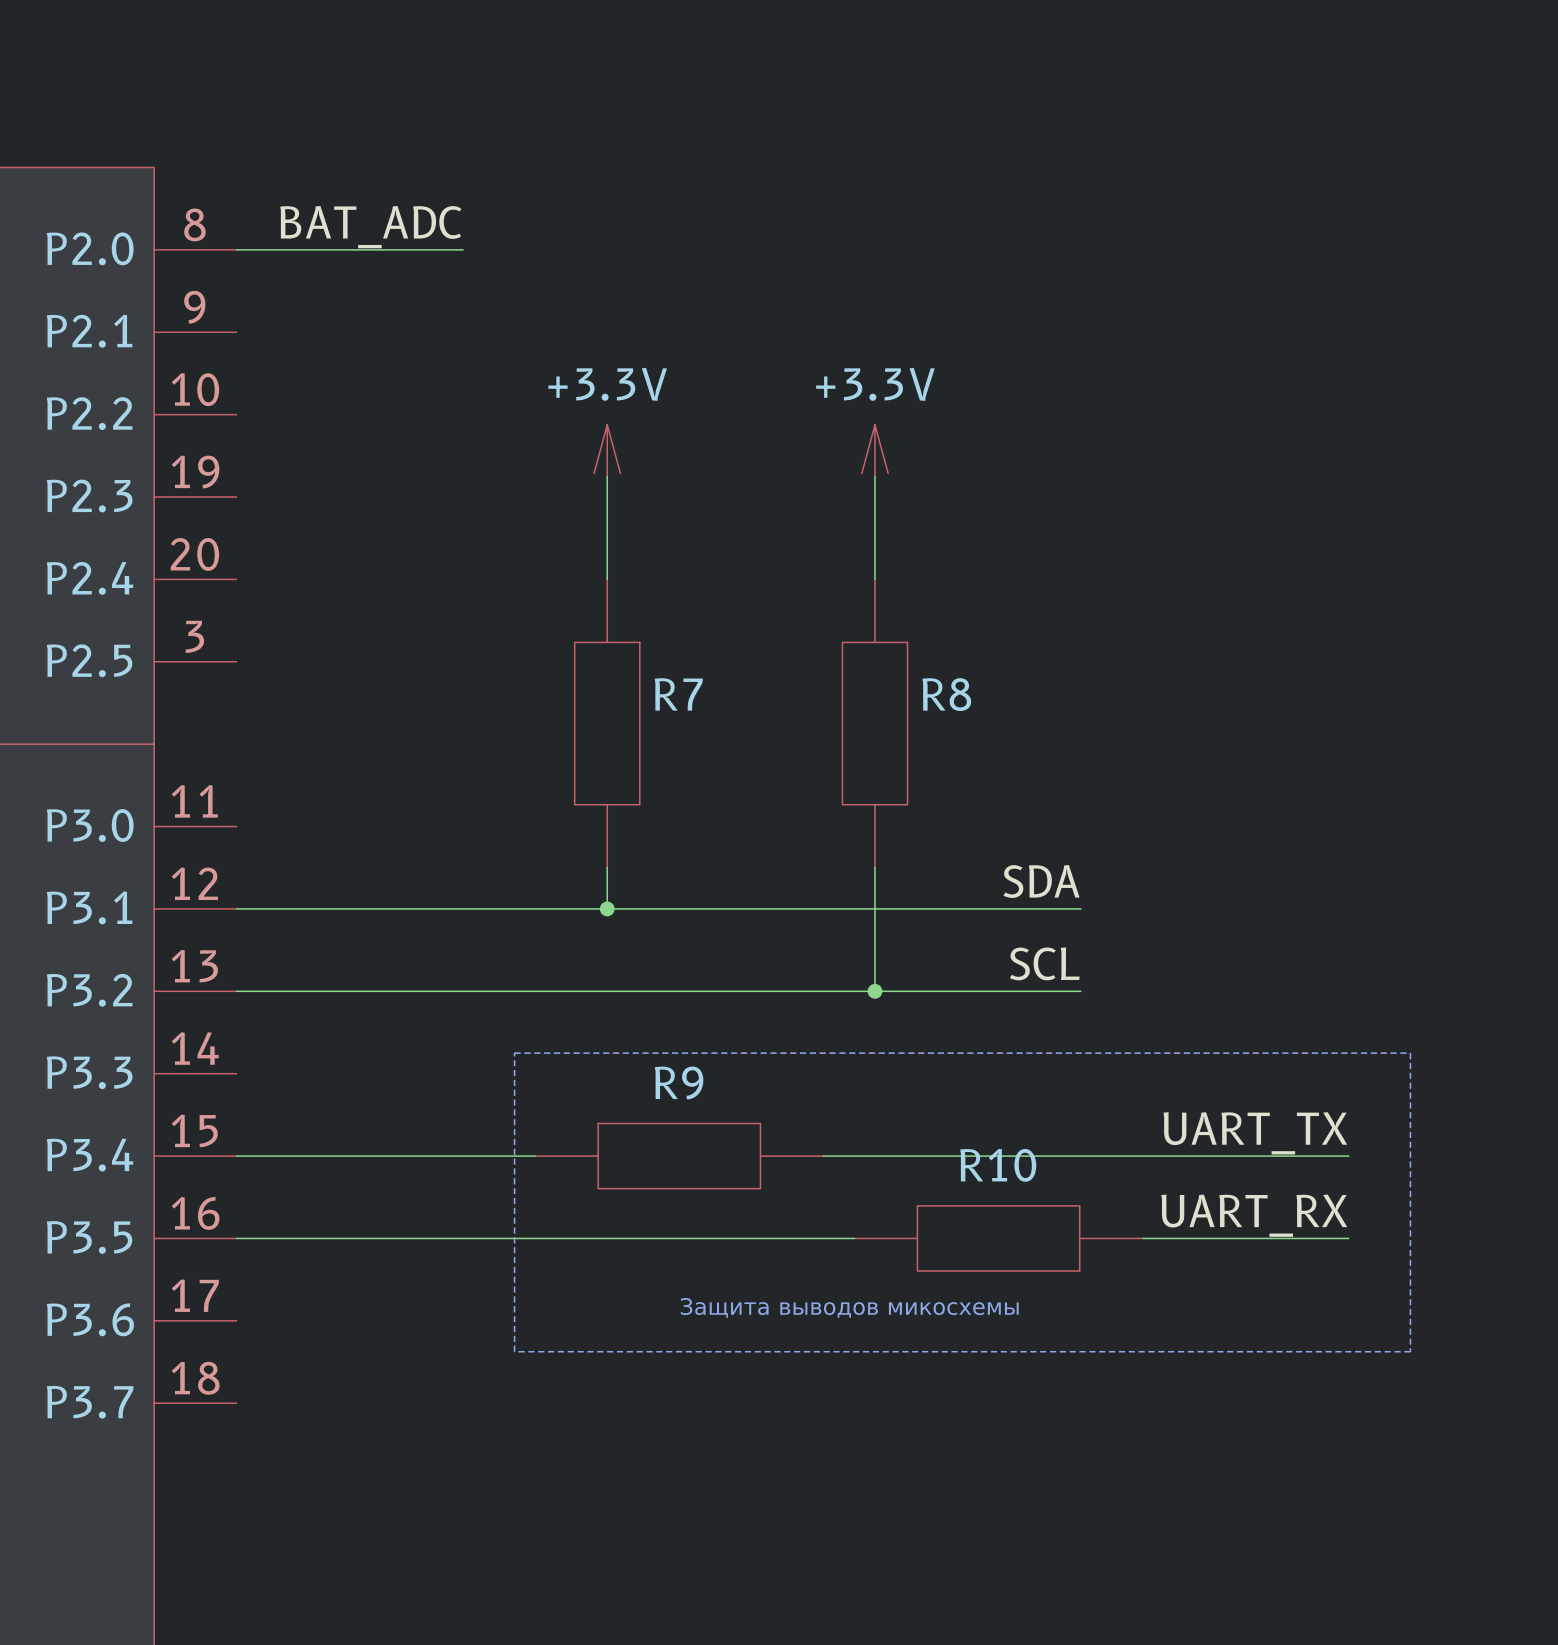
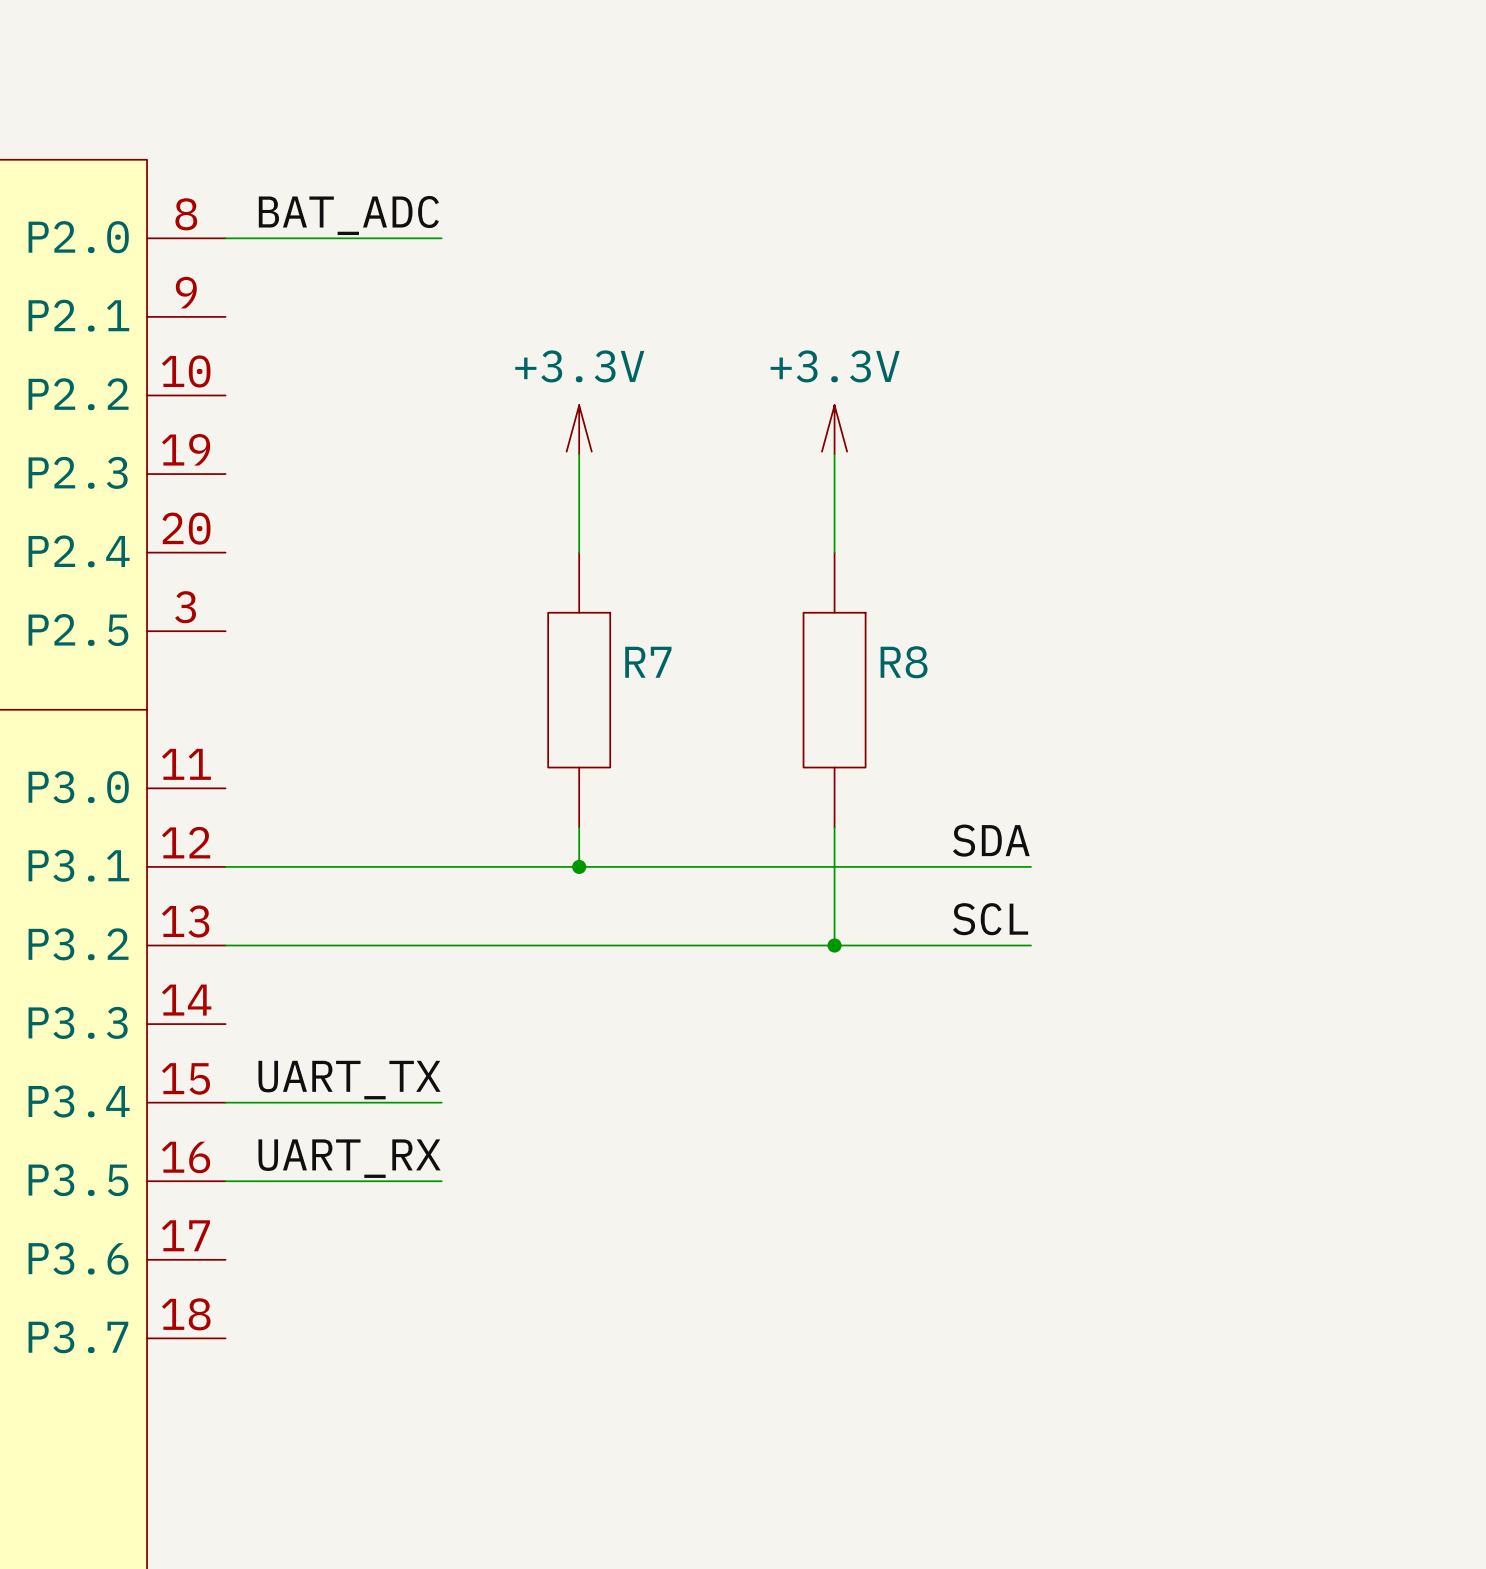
line: (514, 1053) (1410, 1053) (1410, 1351) (514, 1351) (514, 1053) -> none
label: none -> UART_TX (349, 1080)
label: UART_TX (1255, 1133) -> none
wire: (463, 1156) (535, 1156) -> none
R9: (679, 1156) -> none
wire: (823, 1156) (1348, 1156) -> none
label: none -> UART_RX (349, 1158)
label: UART_RX (1254, 1215) -> none
wire: (463, 1238) (854, 1238) -> none
R10: (998, 1238) -> none
wire: (1142, 1238) (1348, 1238) -> none
text: Защита выводов микосхемы (849, 1307) -> none

